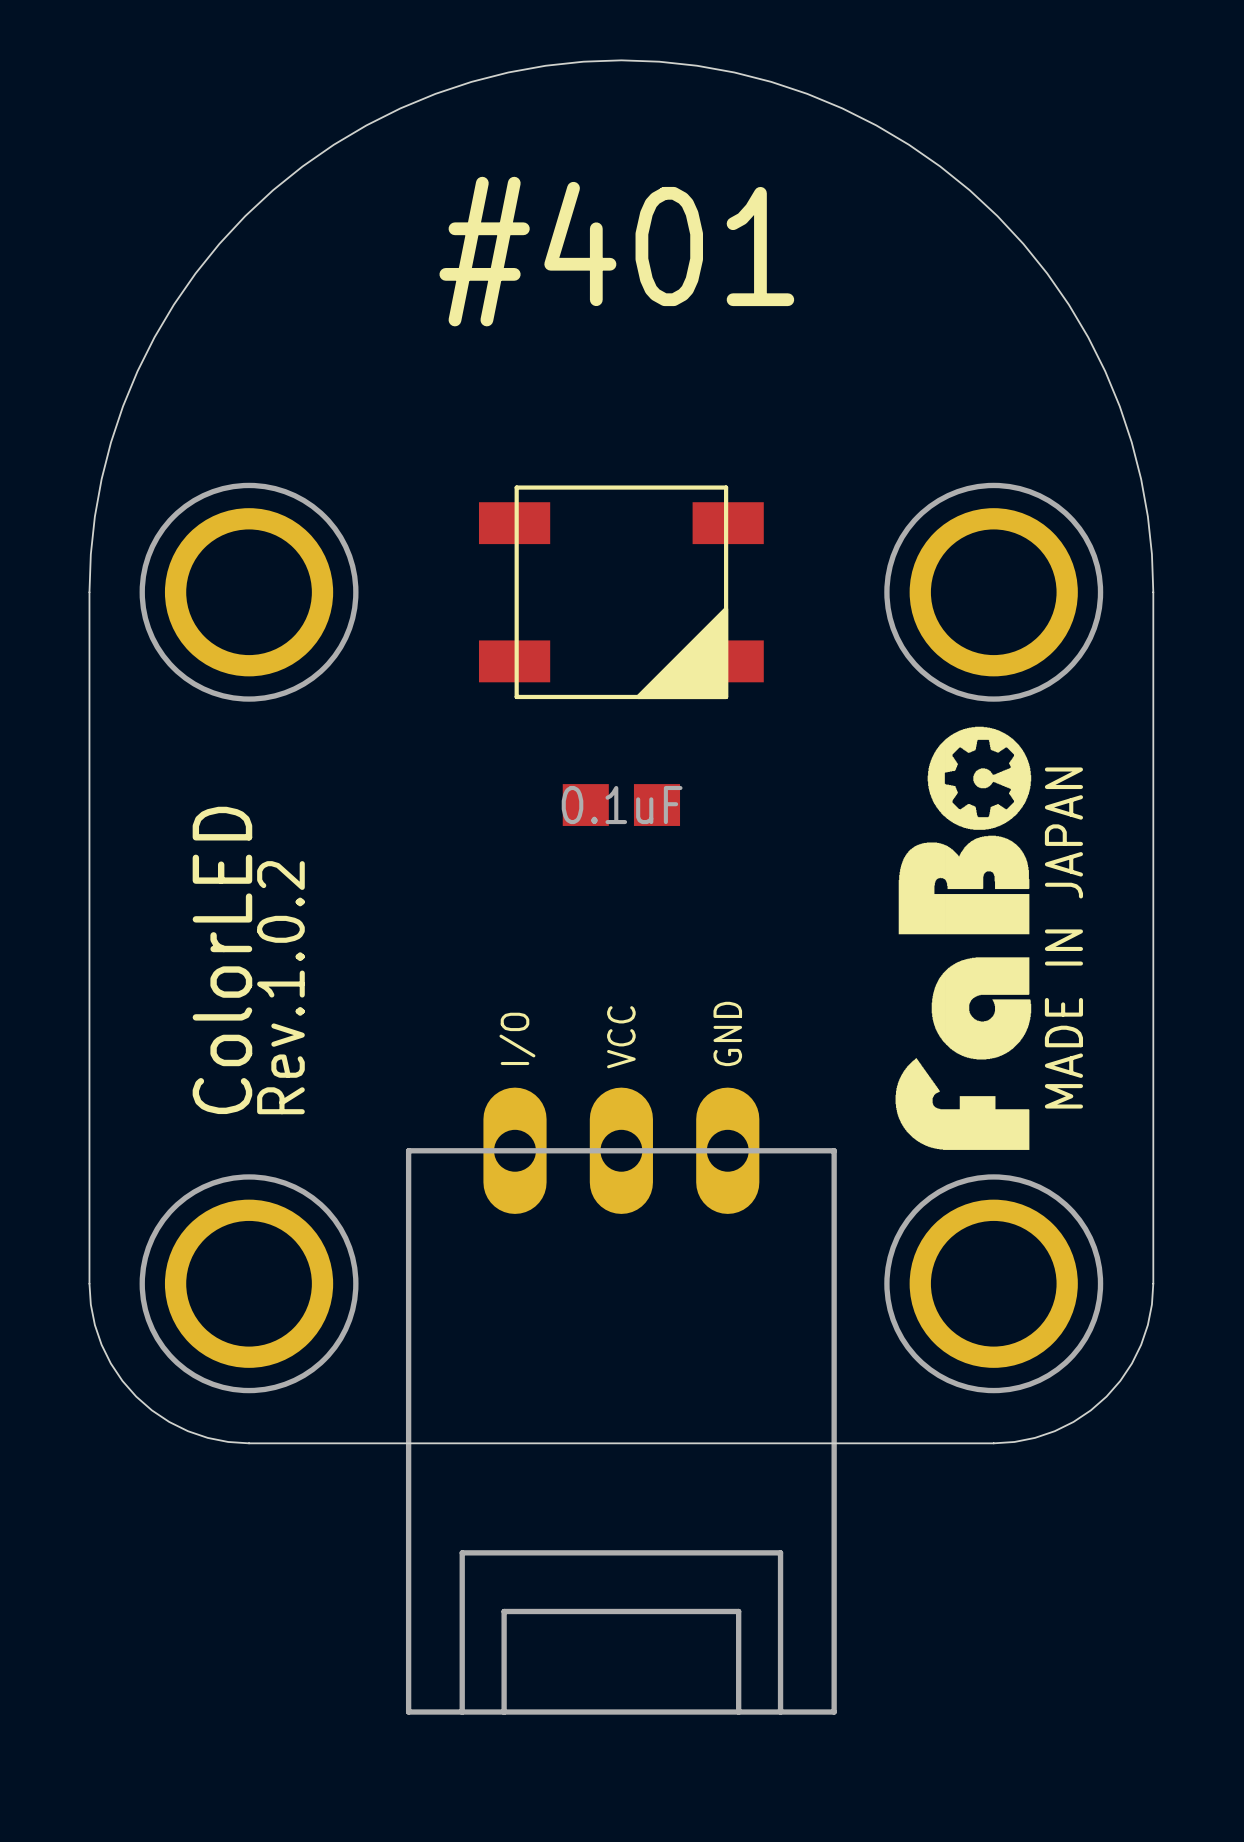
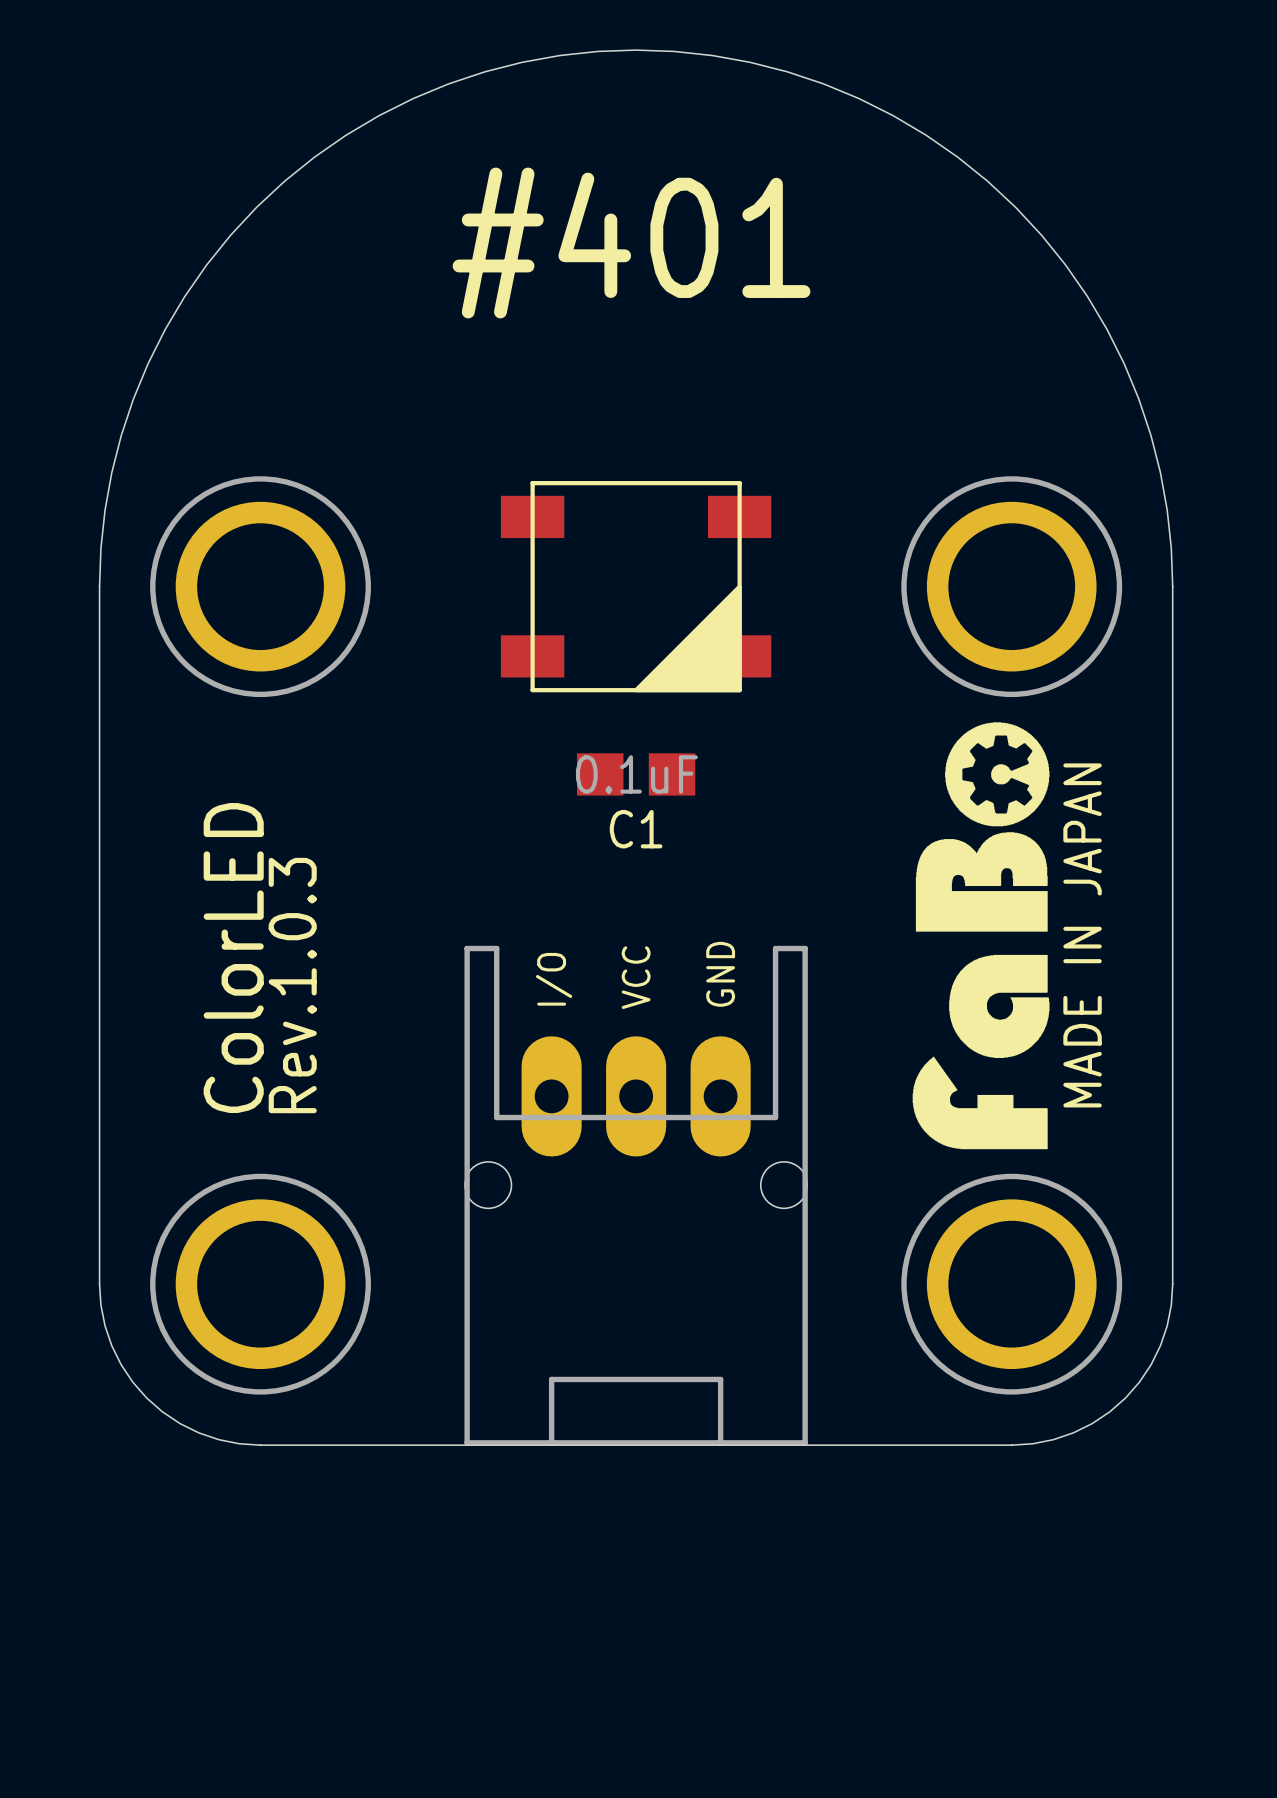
part footprint: [478, 485, 764, 700] -> [500, 481, 772, 693]
part: none -> (636, 747)
C1: none -> 0.1uF (636, 774)
part: 0.1uF (621, 805) -> none
part: (621, 887) -> none
text: Rev.1.0.2 (280, 987) -> Rev.1.0.3 (292, 985)

